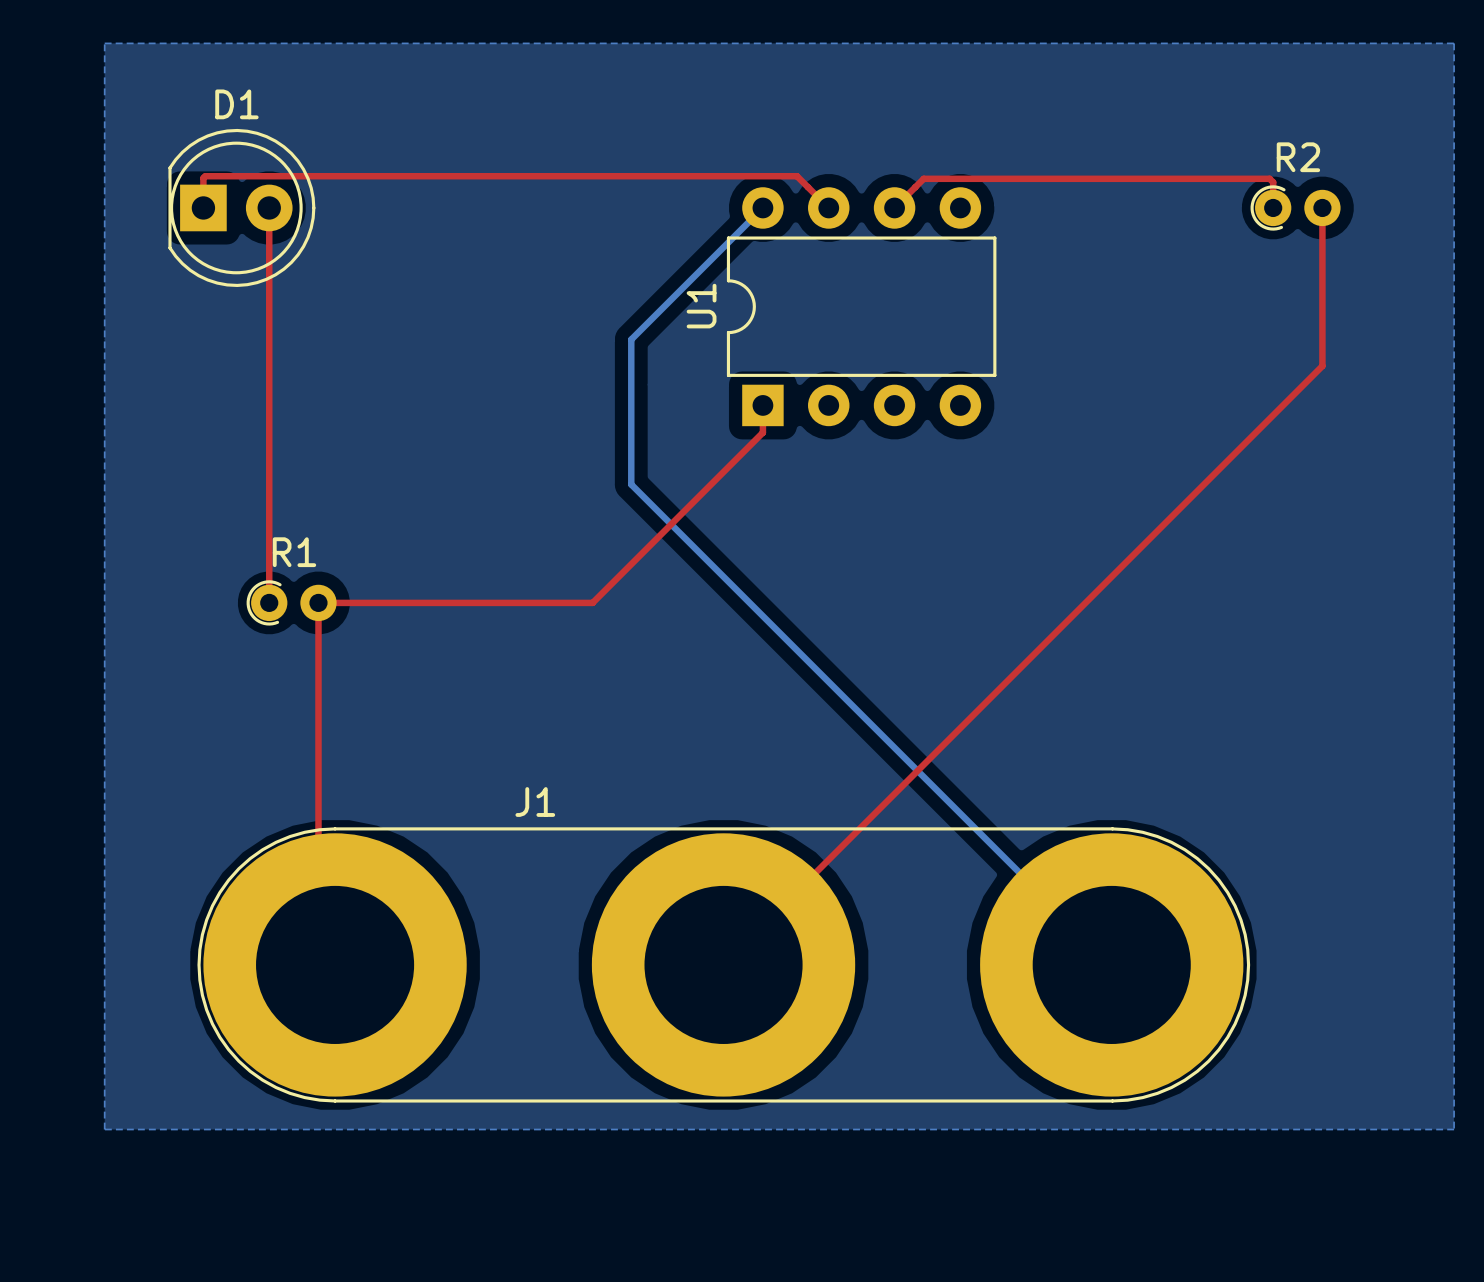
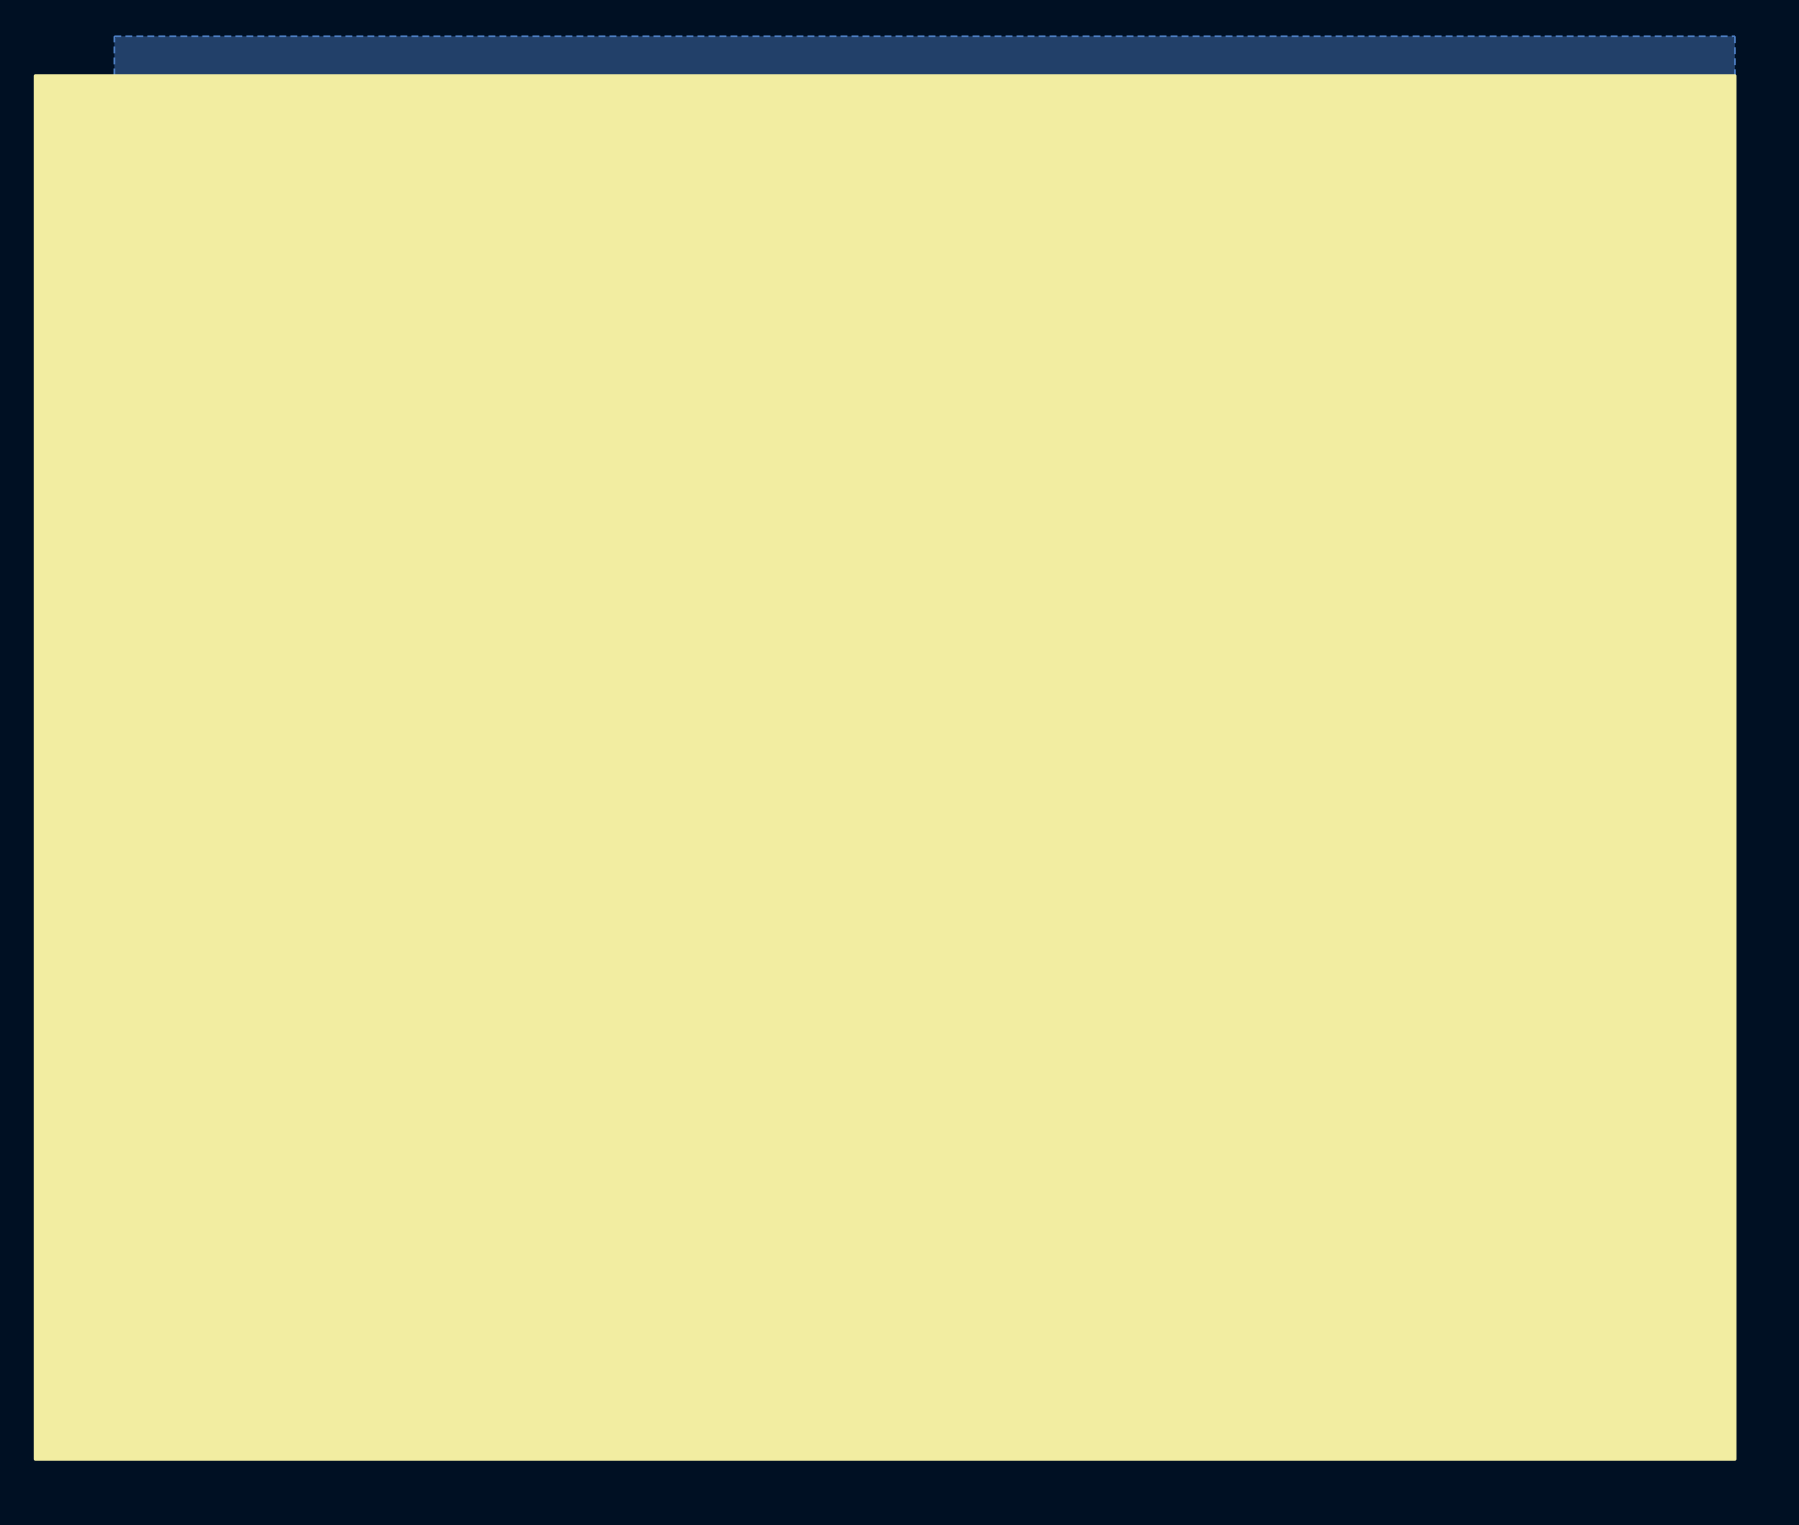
drawing: none -> [33, 74, 1737, 1461]

